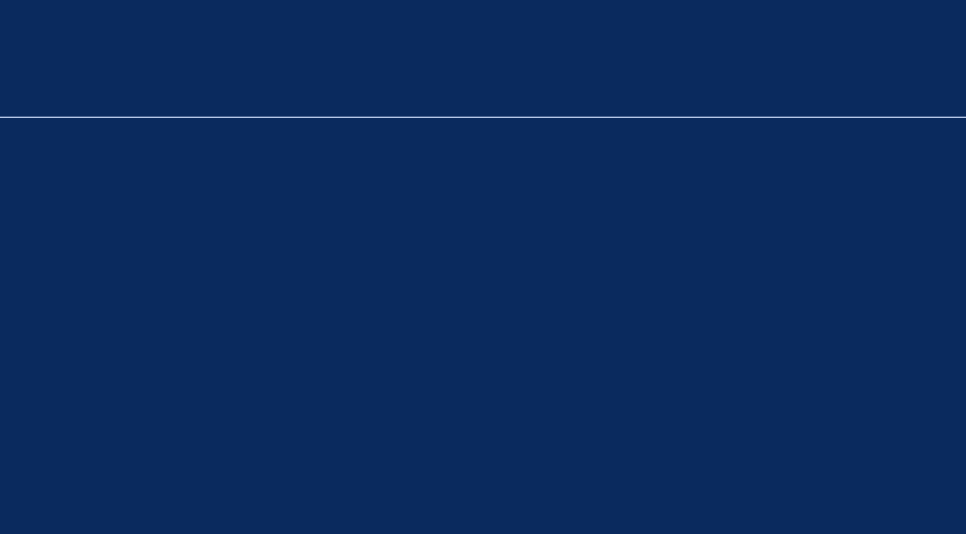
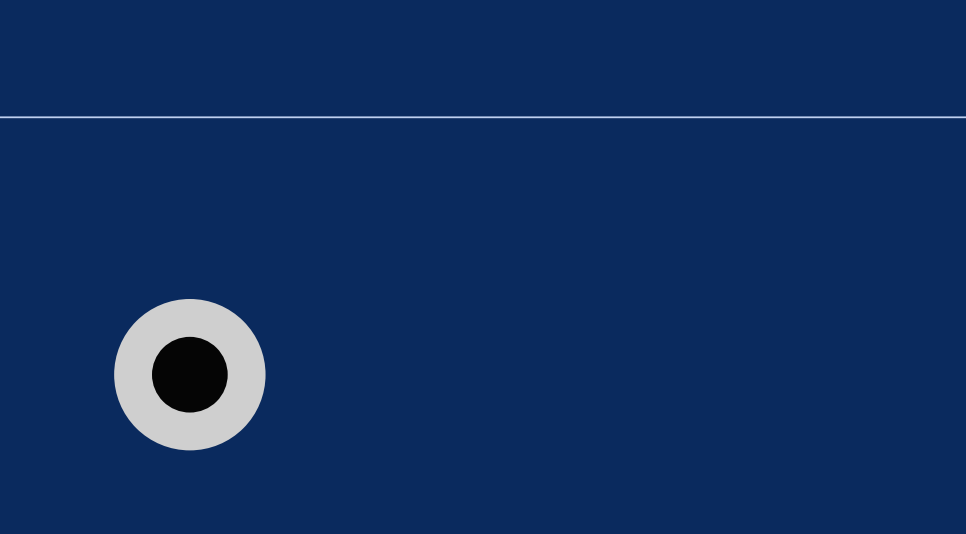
part: none -> (189, 374)

